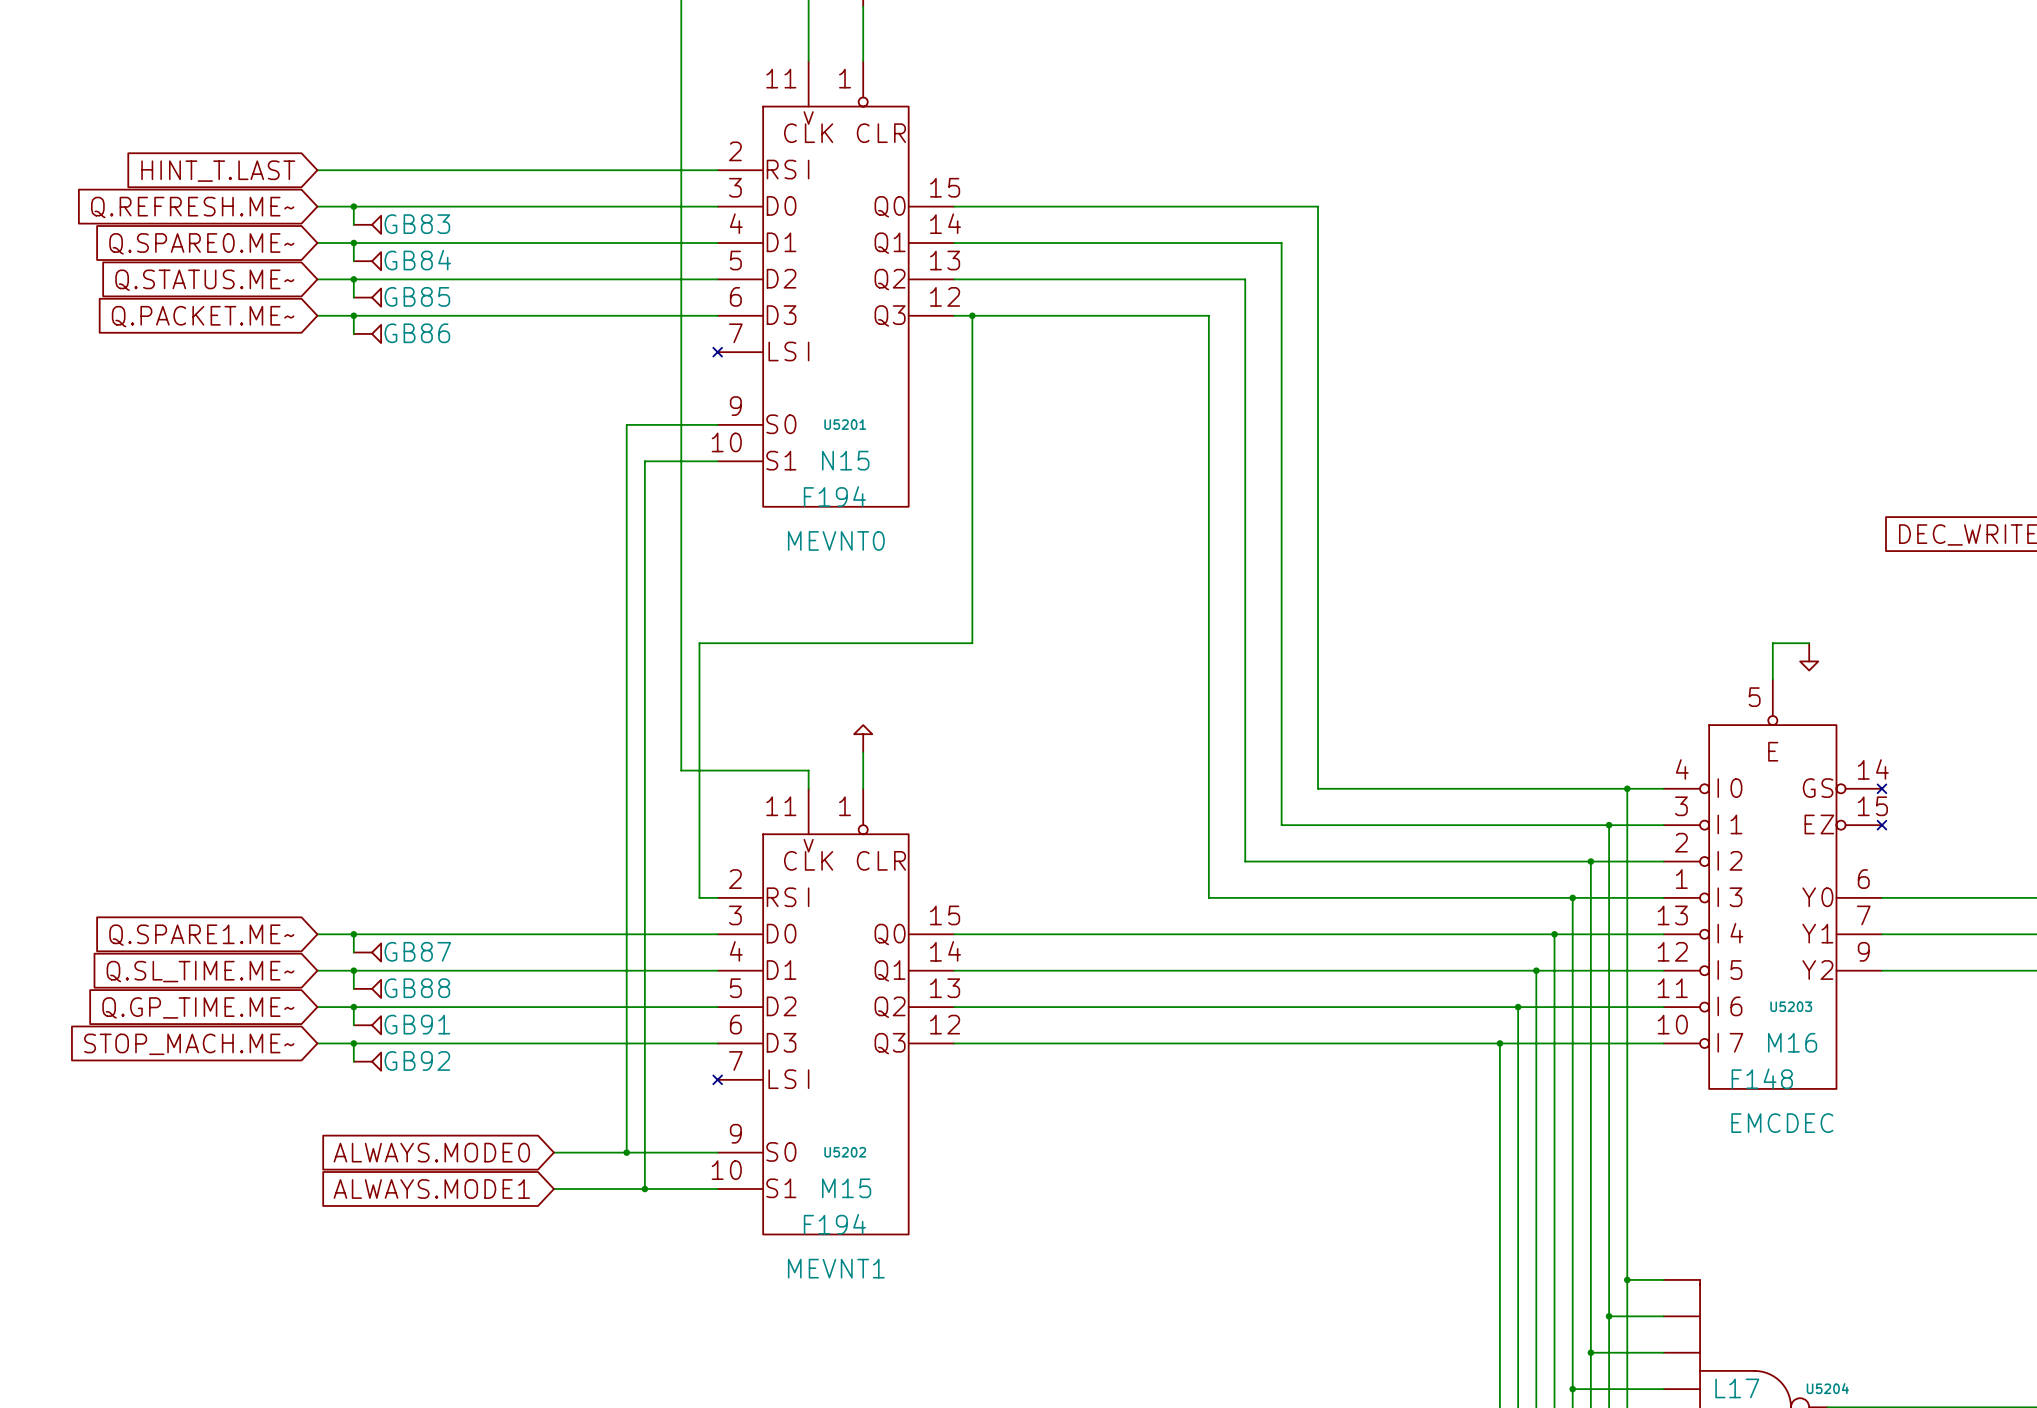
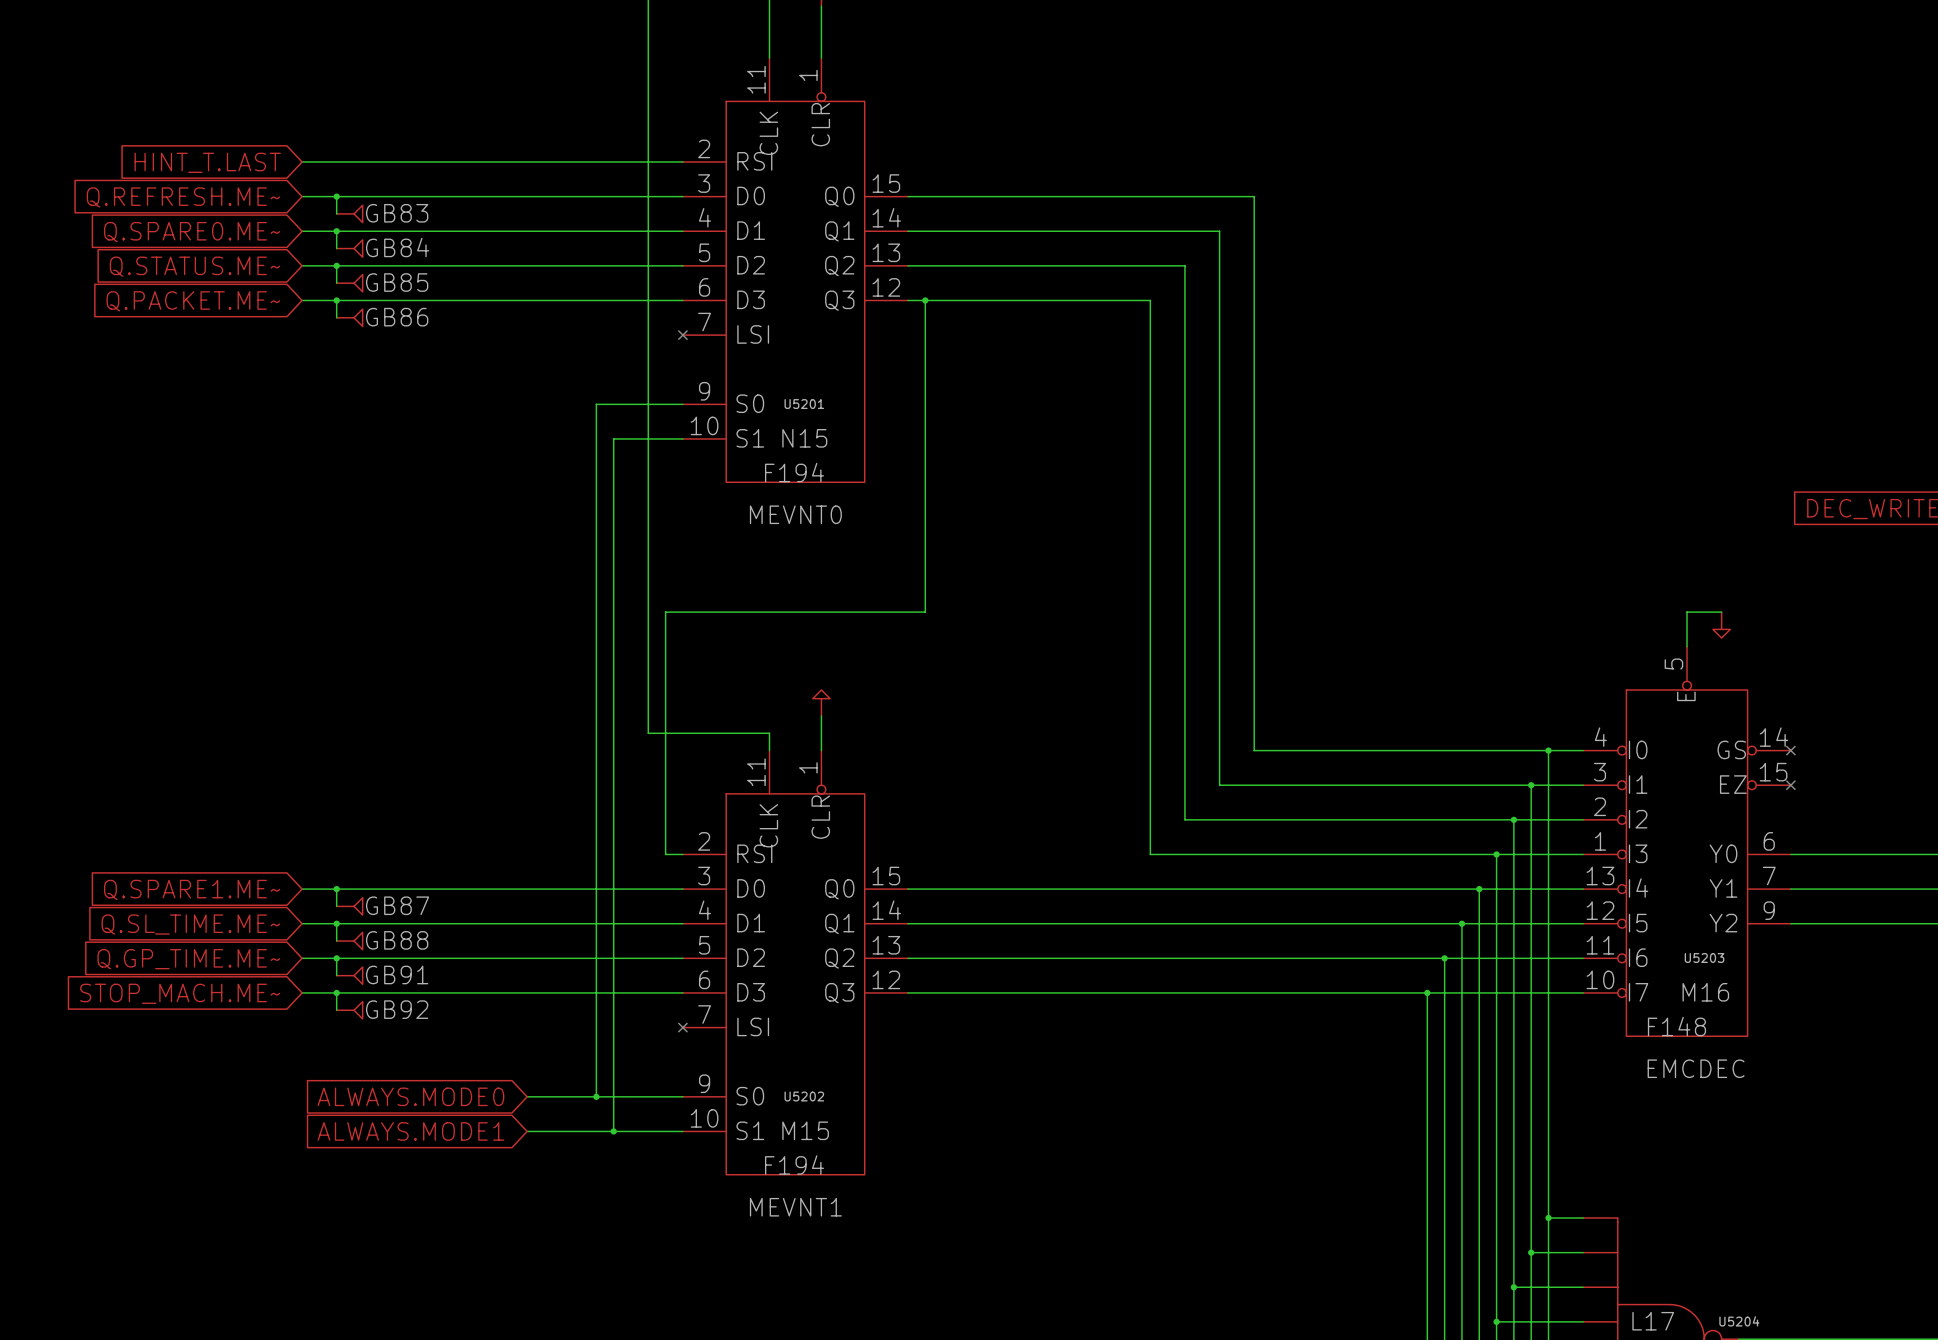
U5201 symbol: [717, 61, 955, 507] -> [682, 58, 908, 483]
U5203 symbol: [1663, 679, 1882, 1089] -> [1583, 646, 1791, 1037]
U5202 symbol: [717, 788, 955, 1235] -> [682, 750, 908, 1175]

